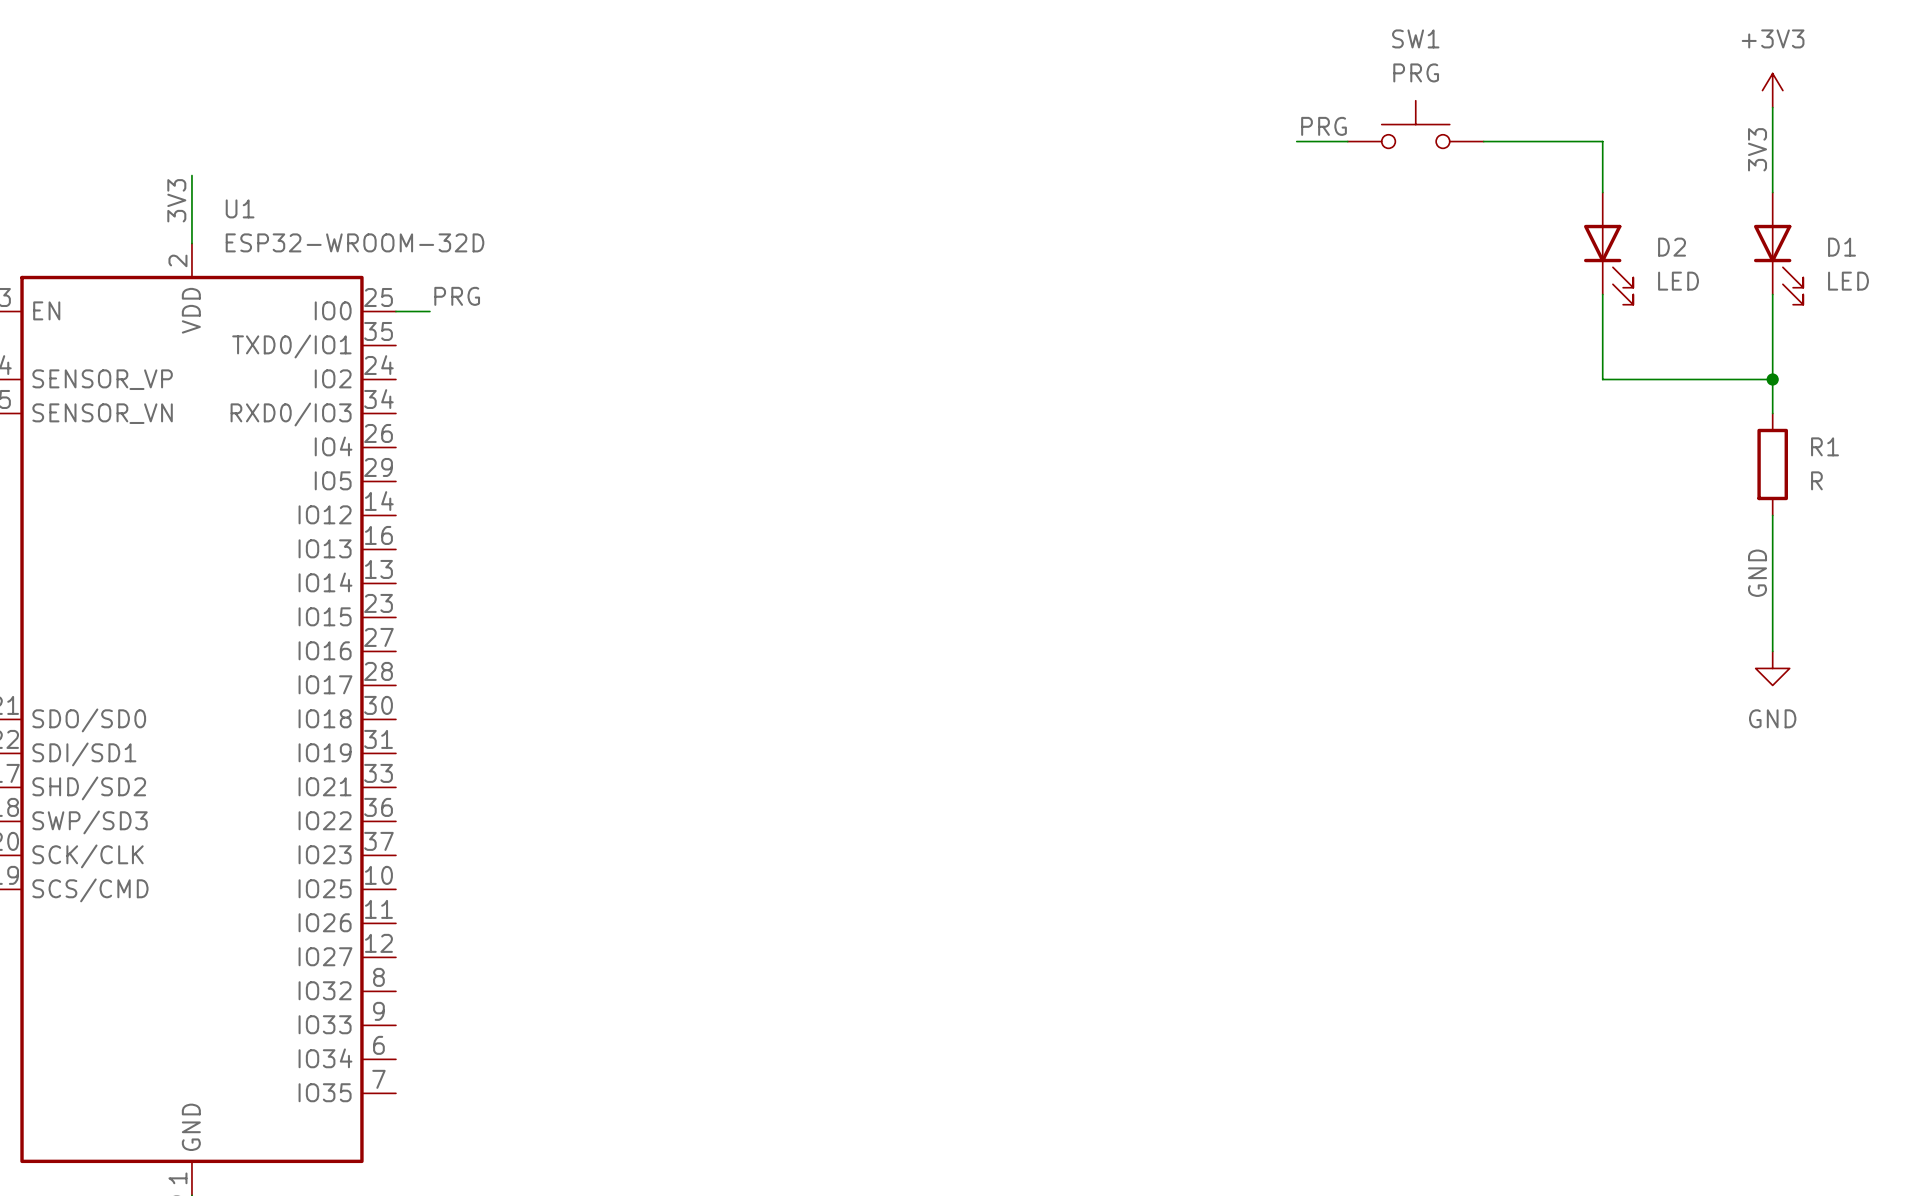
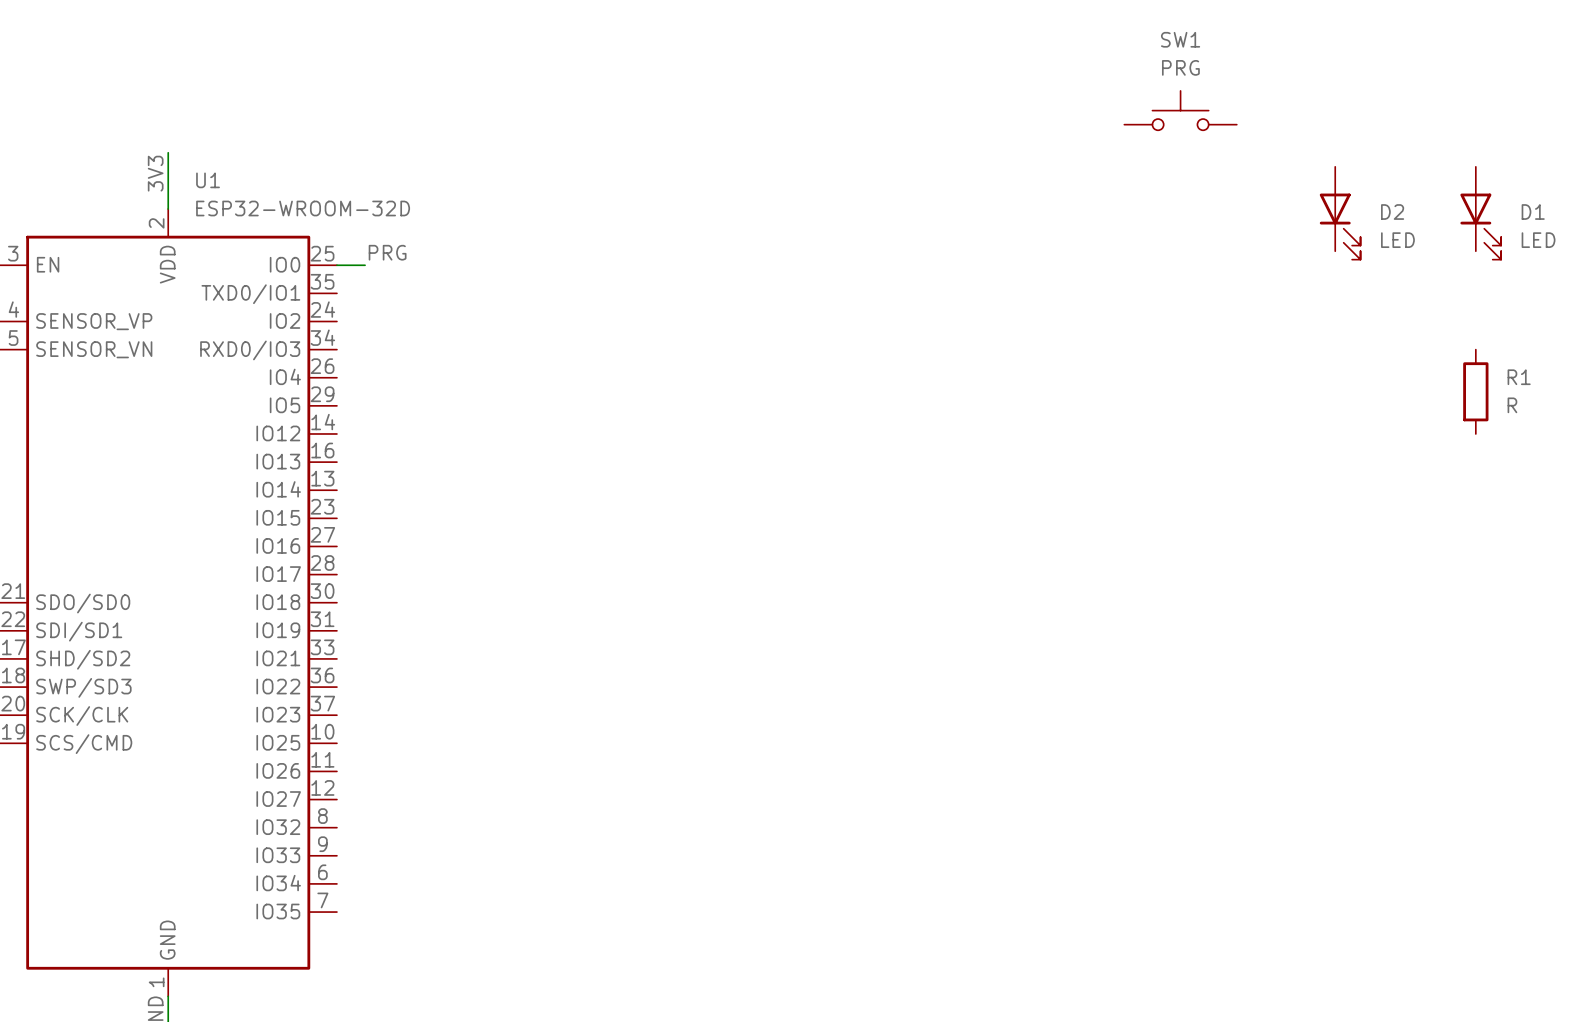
power symbol: +3V3 (1772, 90) -> none
wire: (1772, 107) (1772, 192) -> none
label: PRG (1324, 126) -> none
wire: (1296, 141) (1347, 141) -> none
wire: (1483, 141) (1602, 141) (1602, 192) -> none
label: 3V3 (1757, 149) -> none
wire: (1602, 294) (1602, 379) (1772, 379) -> none
wire: (1772, 294) (1772, 413) -> none
junction: (1772, 379) -> none
wire: (1772, 515) (1772, 651) -> none
label: GND (1757, 573) -> none
power symbol: GND (1772, 668) -> none

